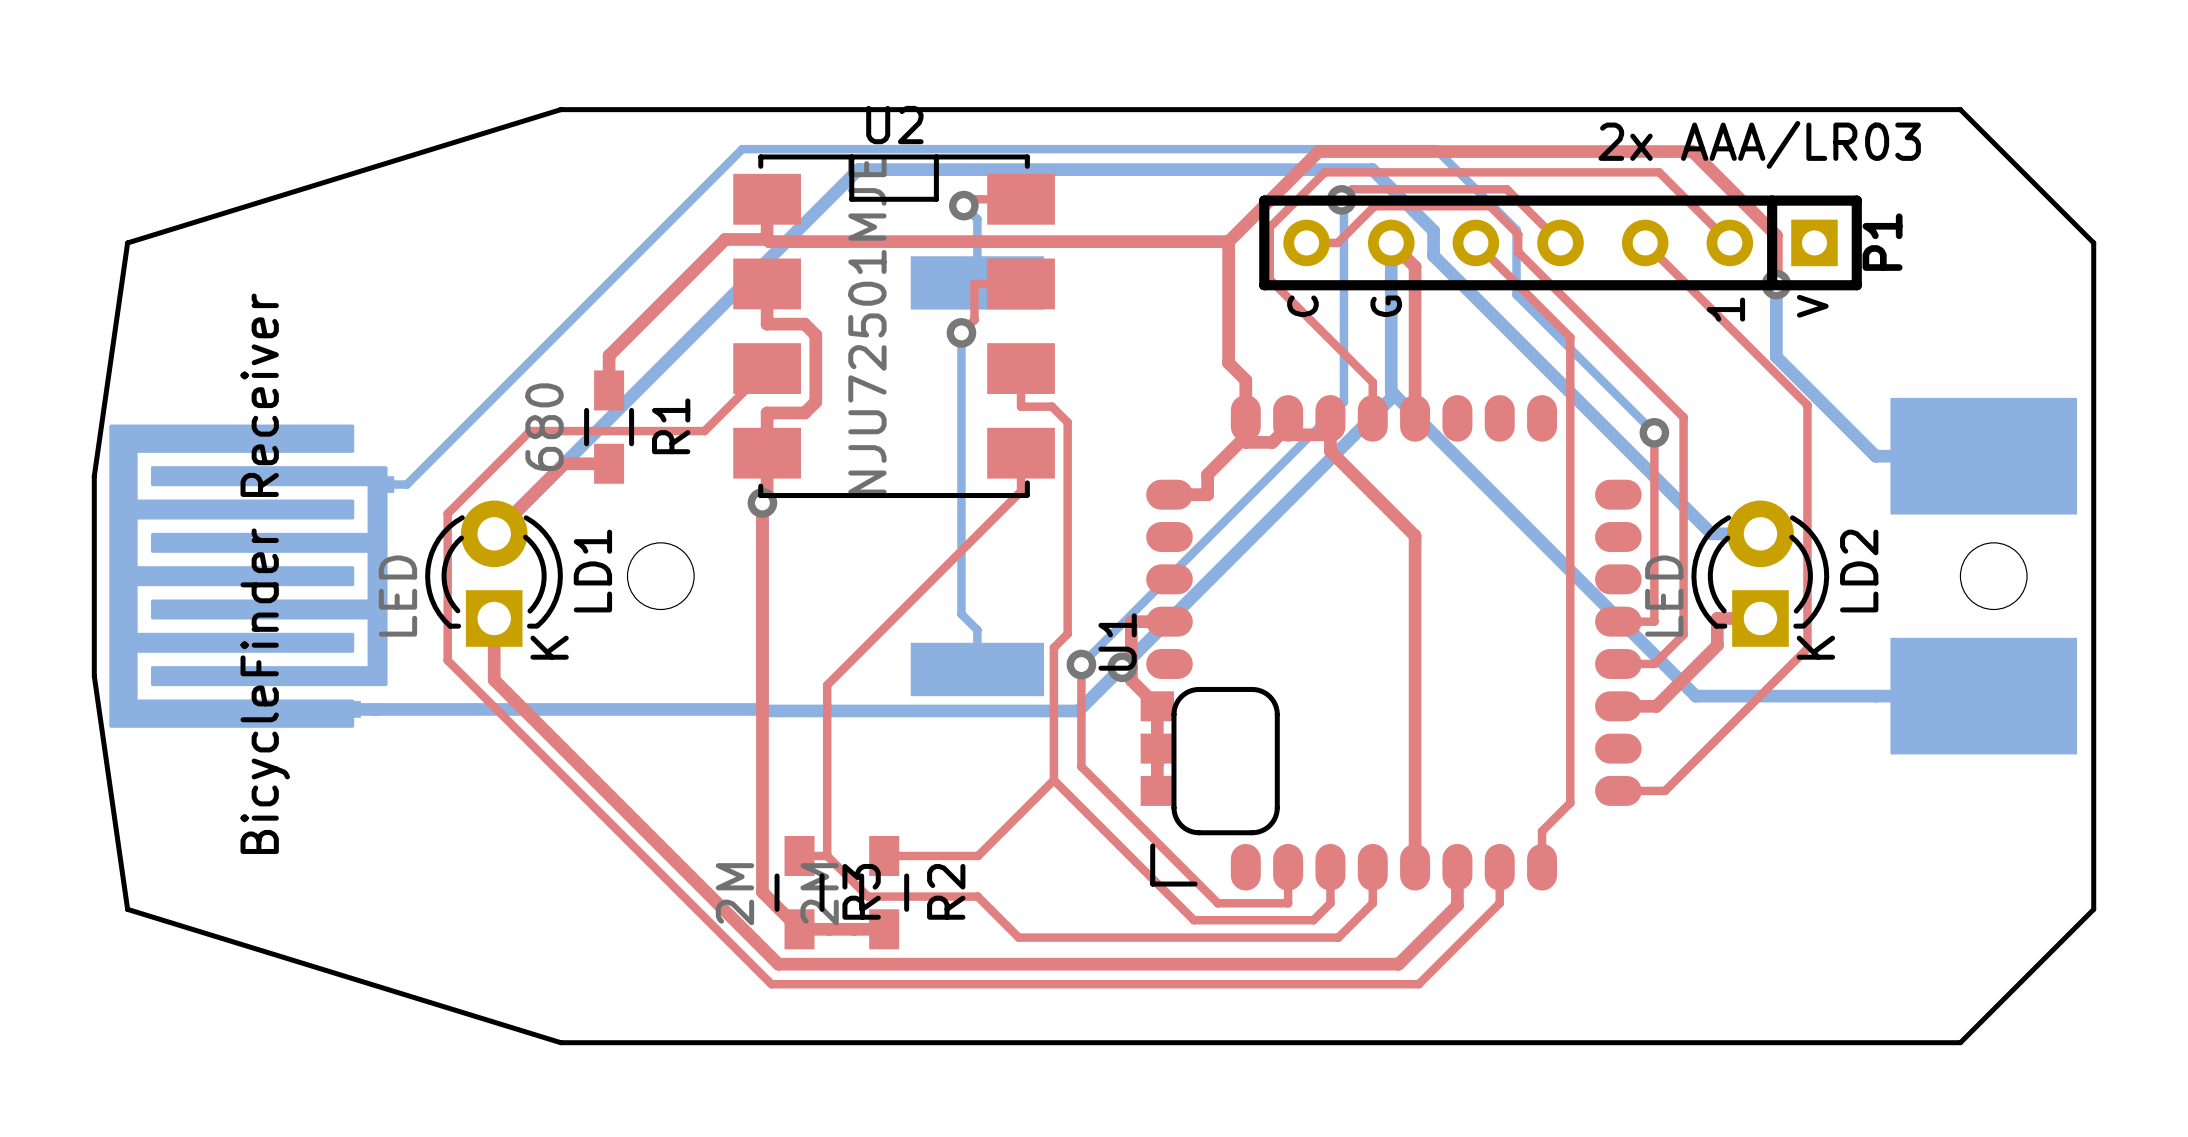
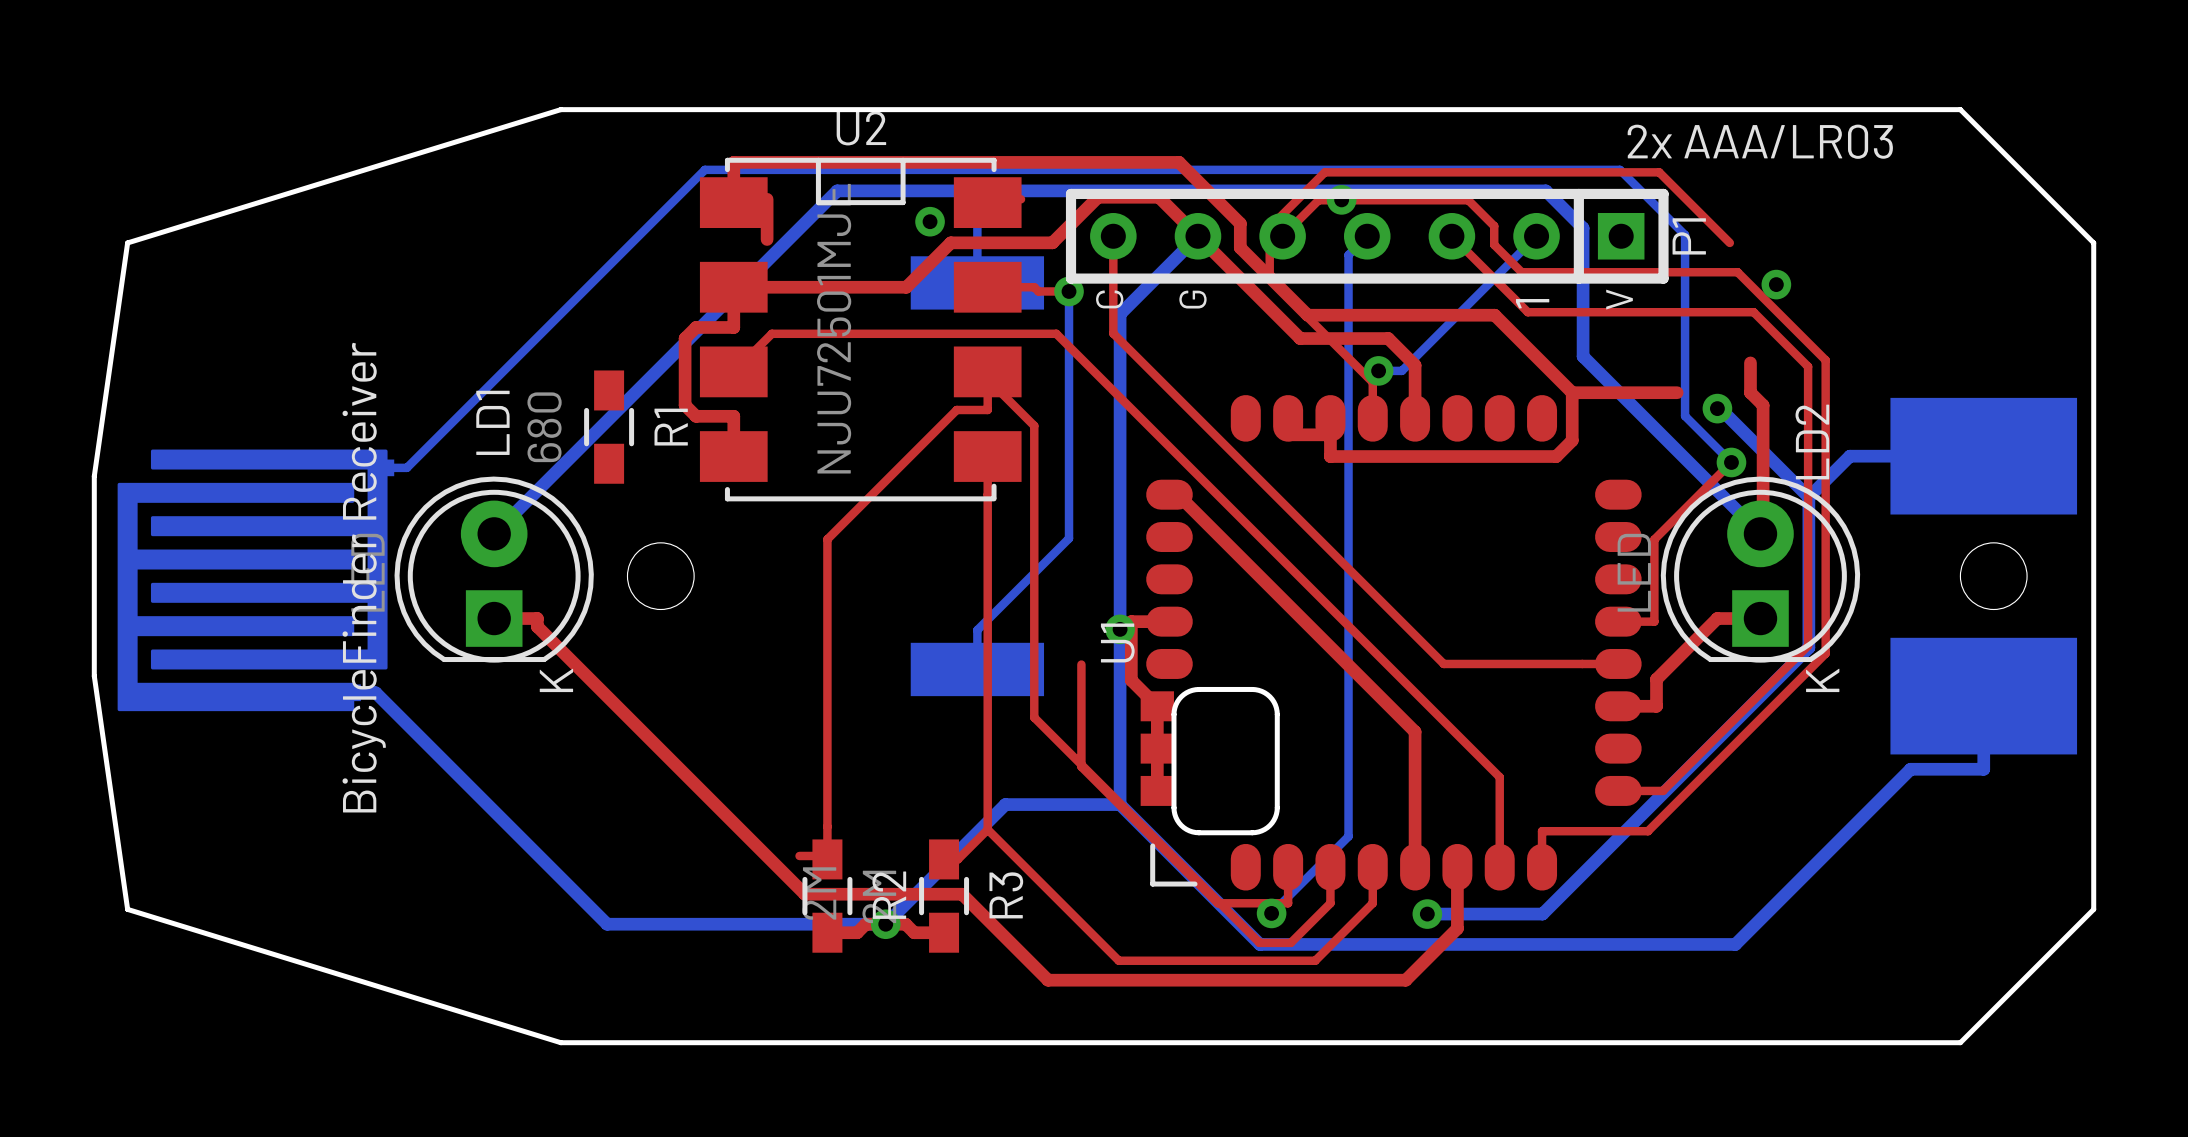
bottom track: (837, 190) (858, 169) (1372, 169) (1433, 230) (1433, 255) (1711, 533) (1760, 533) -> (837, 190) (1545, 190) (1583, 228) (1583, 356) (1760, 533)
top track: (1341, 199) (1352, 189) (1506, 189) (1560, 242) -> none
bottom track: (1341, 199) (1343, 202) (1343, 402) (1081, 664) -> none
top track: none -> (733, 202) (733, 162) (1179, 162) (1240, 223) (1240, 247) (1307, 315) (1494, 315) (1572, 392)
via position: (963, 205) -> (930, 221)
bottom track: none -> (1197, 236) (1120, 314) (1120, 804)
bottom track: none -> (1367, 236) (1348, 255) (1348, 836) (1271, 913)
bottom track: none -> (1536, 236) (1401, 370) (1378, 370)
top track: (1228, 241) (1228, 363) (1245, 380) (1245, 442) (1272, 442) (1288, 426) -> none
top track: (1228, 241) (1318, 151) (1692, 151) (1776, 235) (1776, 284) -> none
top track: (1228, 241) (769, 241) (767, 239) (725, 239) (609, 355) (609, 390) -> none
top track: (1306, 242) (1337, 242) (1374, 206) (1490, 206) (1518, 234) (1518, 252) (1683, 417) (1683, 634) (1654, 663) (1618, 663) -> (1113, 236) (1113, 333) (1443, 663) (1618, 663)
top track: (1391, 242) (1415, 266) (1415, 365) -> (733, 456) (733, 416) (696, 416) (685, 405) (685, 338) (696, 327) (733, 327) (733, 287) (906, 287) (950, 242) (1052, 242) (1098, 197) (1158, 197) (1300, 338) (1388, 338) (1415, 365)
bottom track: (1391, 242) (1391, 391) (1394, 394) -> none
top track: (1475, 242) (1570, 337) (1570, 802) (1542, 831) -> (1282, 236) (1318, 200) (1468, 200) (1494, 226) (1494, 244) (1521, 272) (1737, 272) (1825, 360) (1825, 653) (1648, 831) (1542, 831)
P1 position: (1560, 242) -> (1367, 236)
top track: (1645, 242) (1807, 405) (1807, 648) (1662, 790) -> (1451, 236) (1527, 312) (1753, 312) (1808, 366) (1808, 645) (1662, 790)
top track: (767, 283) (767, 324) (804, 324) (815, 335) (815, 402) (804, 412) (767, 412) (767, 493) (762, 498) (762, 892) (799, 929) (884, 929) -> none
top track: (1021, 283) (974, 283) (974, 319) (961, 332) -> none
bottom track: (1776, 284) (1776, 356) (1875, 456) -> (1808, 497) (1849, 456) (1875, 456)
top track: none -> (987, 287) (1034, 287) (1038, 291) (1069, 291)
via: none -> (1069, 291)
U2 position: (894, 326) -> (860, 329)
bottom track: (961, 332) (961, 614) (977, 630) -> (1069, 291) (1069, 538) (977, 630)
via: (961, 332) -> none
top track: none -> (1750, 362) (1750, 392) (1763, 405) (1763, 531) (1760, 533)
top track: (767, 368) (704, 431) (530, 431) (447, 513) (447, 660) (771, 984) (1418, 984) (1499, 903) (1499, 867) -> (733, 371) (771, 333) (1056, 333) (1499, 777) (1499, 867)
top track: (1021, 368) (1021, 406) (1051, 406) (1067, 422) (1067, 633) (1053, 647) (1053, 780) -> none
via: none -> (1378, 370)
top track: none -> (987, 371) (987, 409) (956, 409) (827, 539) (827, 859)
top track: none -> (1572, 392) (1572, 440) (1556, 456) (1330, 456) (1330, 451)
top track: none -> (1572, 392) (1677, 392)
bottom track: (1394, 394) (1695, 696) (1983, 696) -> (1120, 804) (1259, 944) (1735, 944) (1910, 769) (1983, 769) (1983, 696)
bottom track: (1394, 394) (1078, 710) (762, 709) -> none
bottom track: none -> (1717, 408) (1720, 408) (1808, 497)
via: none -> (1717, 408)
part footprint: [109, 424, 395, 728] -> [117, 449, 395, 712]
top track: (1654, 432) (1654, 539) -> (1731, 462) (1654, 539)
bottom track: (1654, 432) (1516, 294) (1516, 230) (1435, 149) (742, 149) (406, 484) (385, 484) -> none
via: (1654, 432) -> none
top track: (1245, 436) (1207, 474) (1207, 494) (1177, 494) -> none
top track: (1330, 451) (1415, 535) (1415, 731) -> (1177, 494) (1415, 731)
top track: (1021, 453) (1021, 491) (827, 685) (827, 855) (867, 896) (977, 896) (1018, 937) (1338, 937) -> (987, 829) (1118, 960) (1315, 960) (1338, 937)
top track: none -> (987, 456) (987, 829)
bottom track: none -> (1731, 462) (1685, 416) (1685, 235) (1619, 169) (704, 169) (406, 467) (385, 467)
via: none -> (1731, 462)
top track: (609, 463) (564, 463) (494, 533) -> none
bottom track: none -> (1808, 497) (1808, 647) (1542, 914) (1427, 914)
LD1 footprint: [425, 500, 563, 647] -> [394, 476, 594, 663]
LD2 footprint: [1691, 500, 1830, 647] -> [1660, 476, 1861, 663]
via: (762, 502) -> none
LD1 name position: LD1 (592, 571) -> LD1 (492, 422)
LD2 name position: LD2 (1859, 571) -> LD2 (1812, 442)
text position: BicycleFinder Receiver (265, 573) -> BicycleFinder Receiver (364, 577)
top track: (494, 618) (494, 679) (778, 964) (1398, 964) (1457, 905) -> (494, 618) (537, 618) (537, 626) (804, 894) (962, 894) (1048, 980) (1405, 980) (1457, 928) (1457, 905)
top track: (1717, 618) (1717, 645) (1656, 706) -> (1717, 618) (1656, 679) (1656, 706)
via: none -> (1120, 629)
via: (1081, 664) -> none
via: (1122, 667) -> none
bottom track: none -> (352, 692) (375, 692) (607, 924) (885, 924) (1005, 804) (1120, 804)
bottom track: (352, 709) (762, 709) -> none
top track: (1053, 780) (1193, 920) (1313, 920) -> (987, 390) (999, 390) (1034, 425) (1034, 717) (1259, 942) (1290, 942) (1313, 920)
top track: (1053, 780) (978, 855) (884, 855) -> none
top track: none -> (987, 829) (957, 859) (944, 859)
R3 position: (799, 892) -> (944, 896)
R2 position: (884, 892) -> (827, 896)
via: none -> (1271, 913)
via: none -> (1427, 914)
via: none -> (885, 924)
top track: none -> (827, 932) (857, 932) (865, 924) (905, 924) (914, 932) (944, 932)

